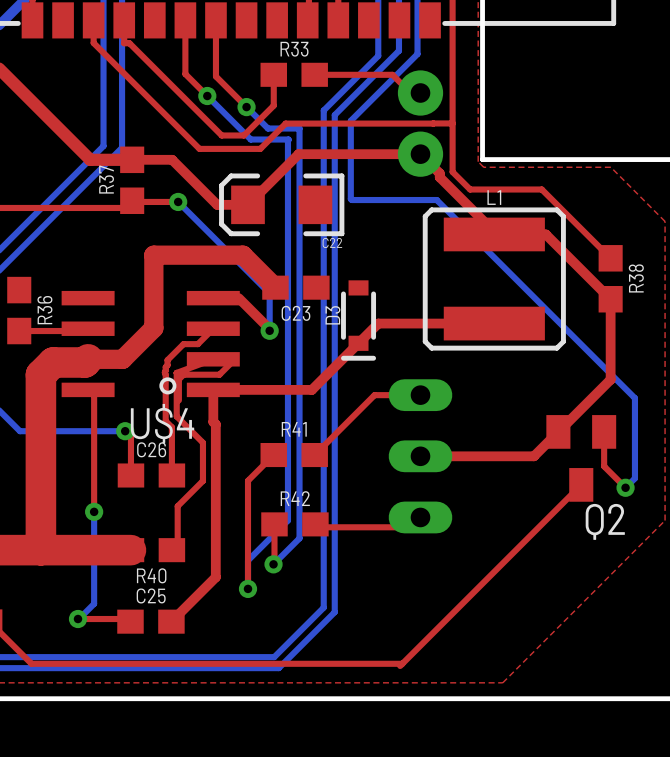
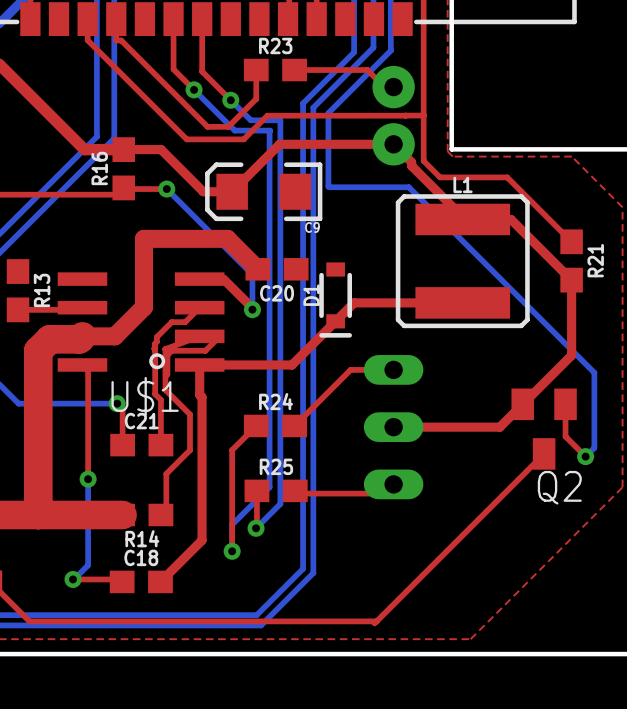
R33 name: R33 (294, 49) -> R23 (275, 45)
R37 name: R37 (106, 179) -> R16 (99, 168)
C22 name: C22 (332, 243) -> C9 (312, 227)
R38 name: R38 (636, 278) -> R21 (595, 260)
R36 name: R36 (44, 310) -> R13 (42, 290)
C23 name: C23 (295, 313) -> C20 (277, 293)
D3 name: D3 (332, 315) -> D1 (311, 295)
U$4 name: U$4 (162, 423) -> U$1 (145, 396)
R41 name: R41 (294, 429) -> R24 (276, 401)
C26 name: C26 (151, 449) -> C21 (141, 421)
R42 name: R42 (295, 498) -> R25 (276, 466)
R40 name: R40 (151, 575) -> R14 (142, 538)
C25 name: C25 (151, 595) -> C18 (141, 557)

